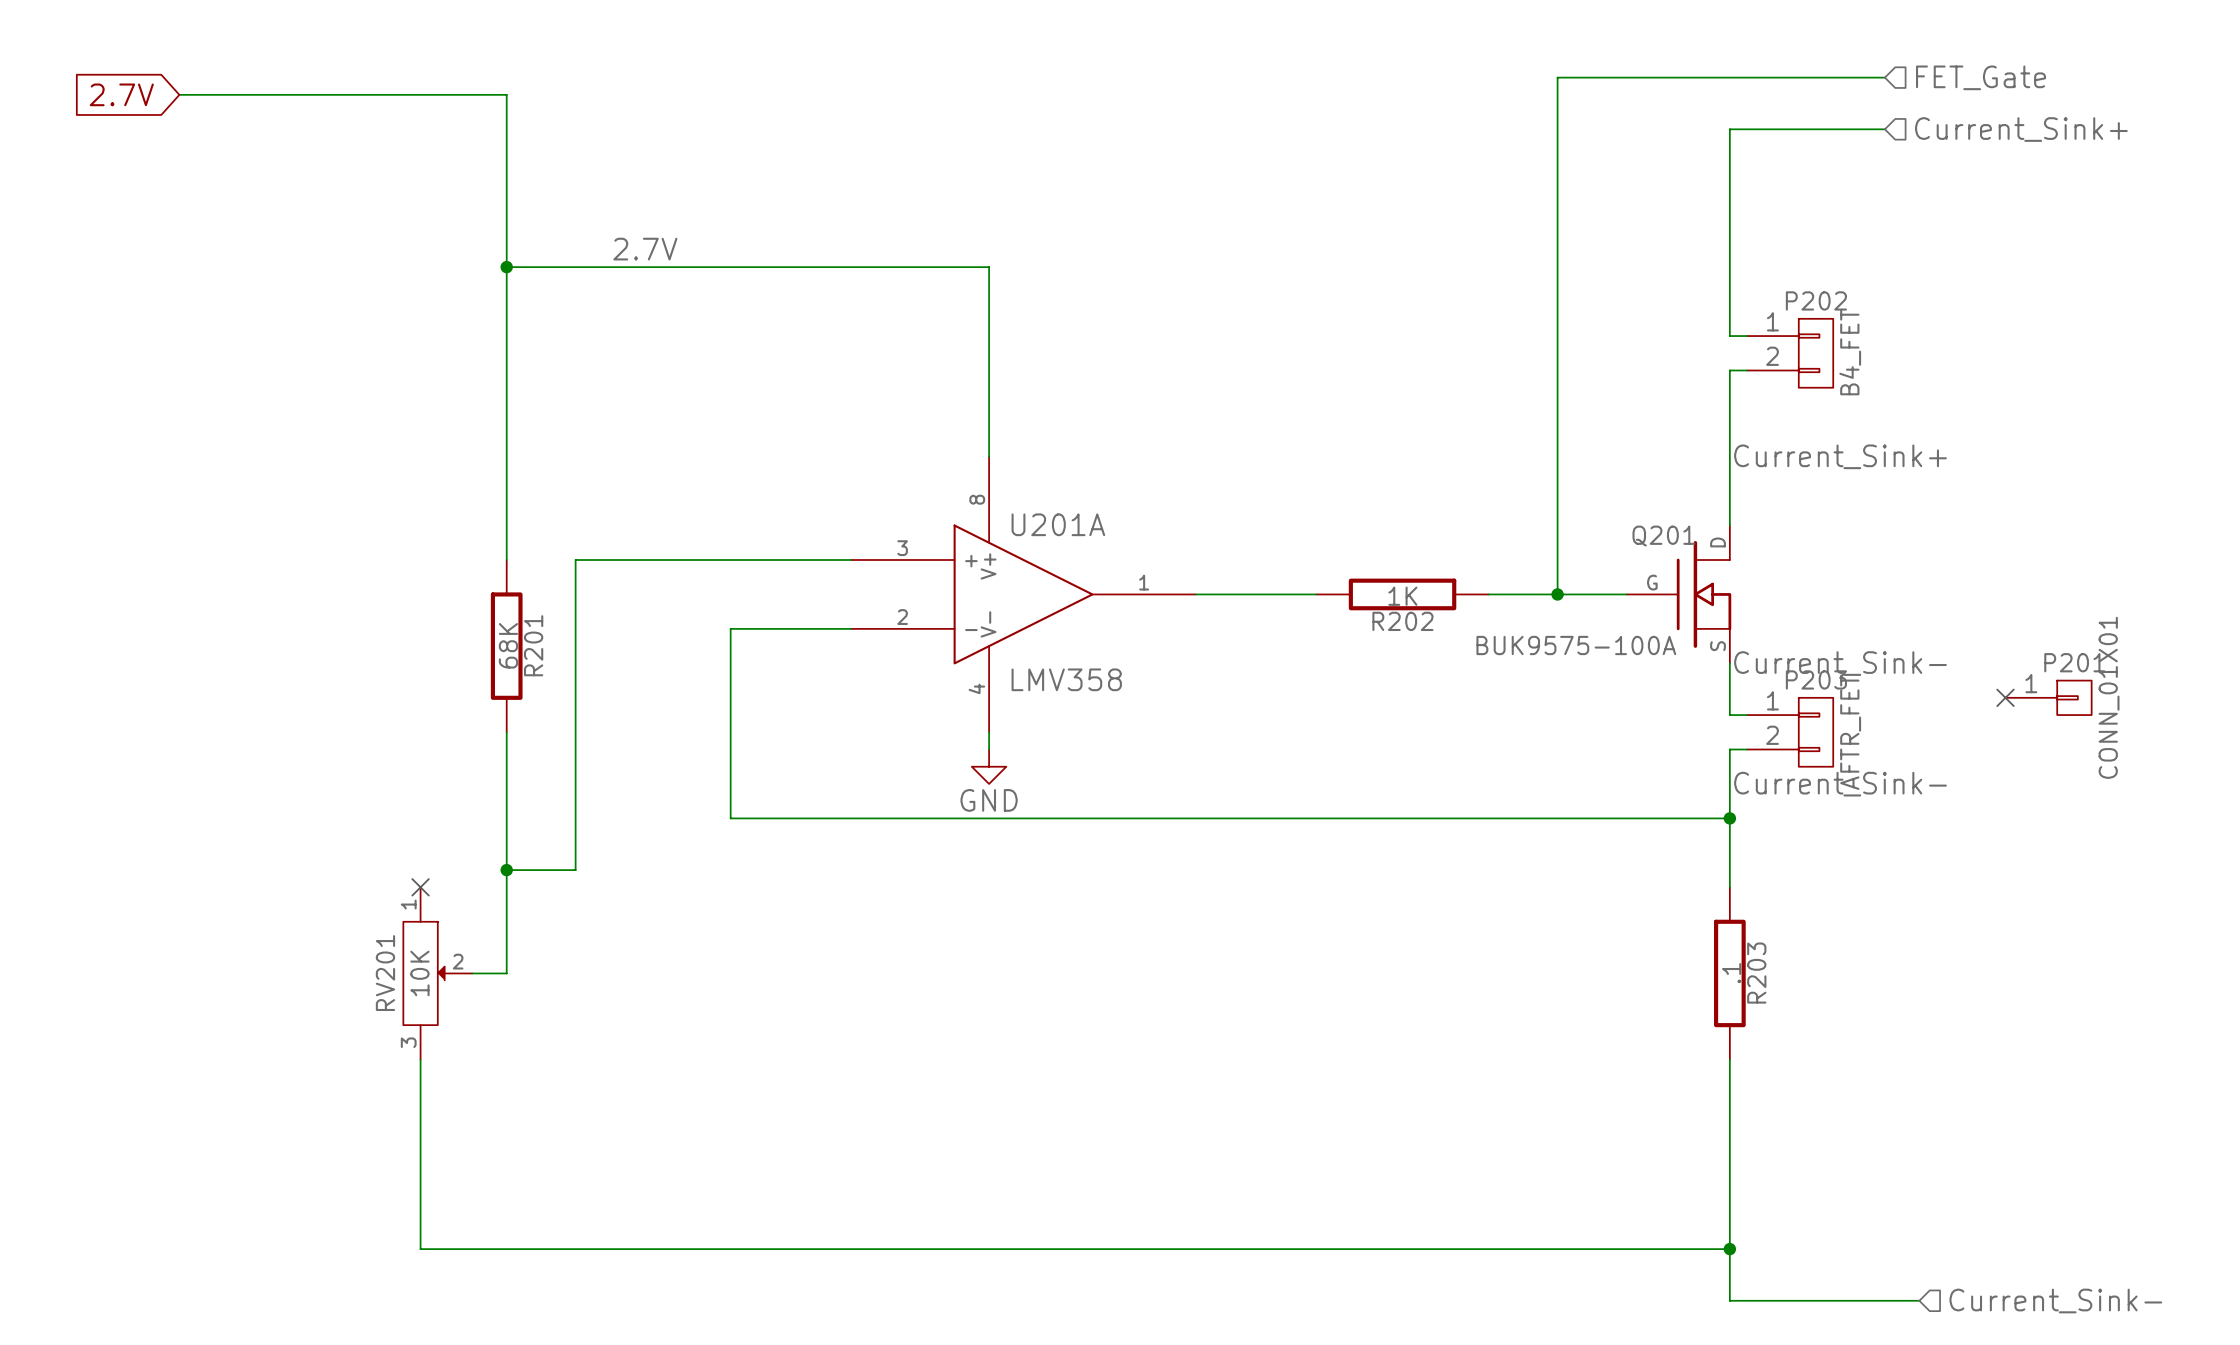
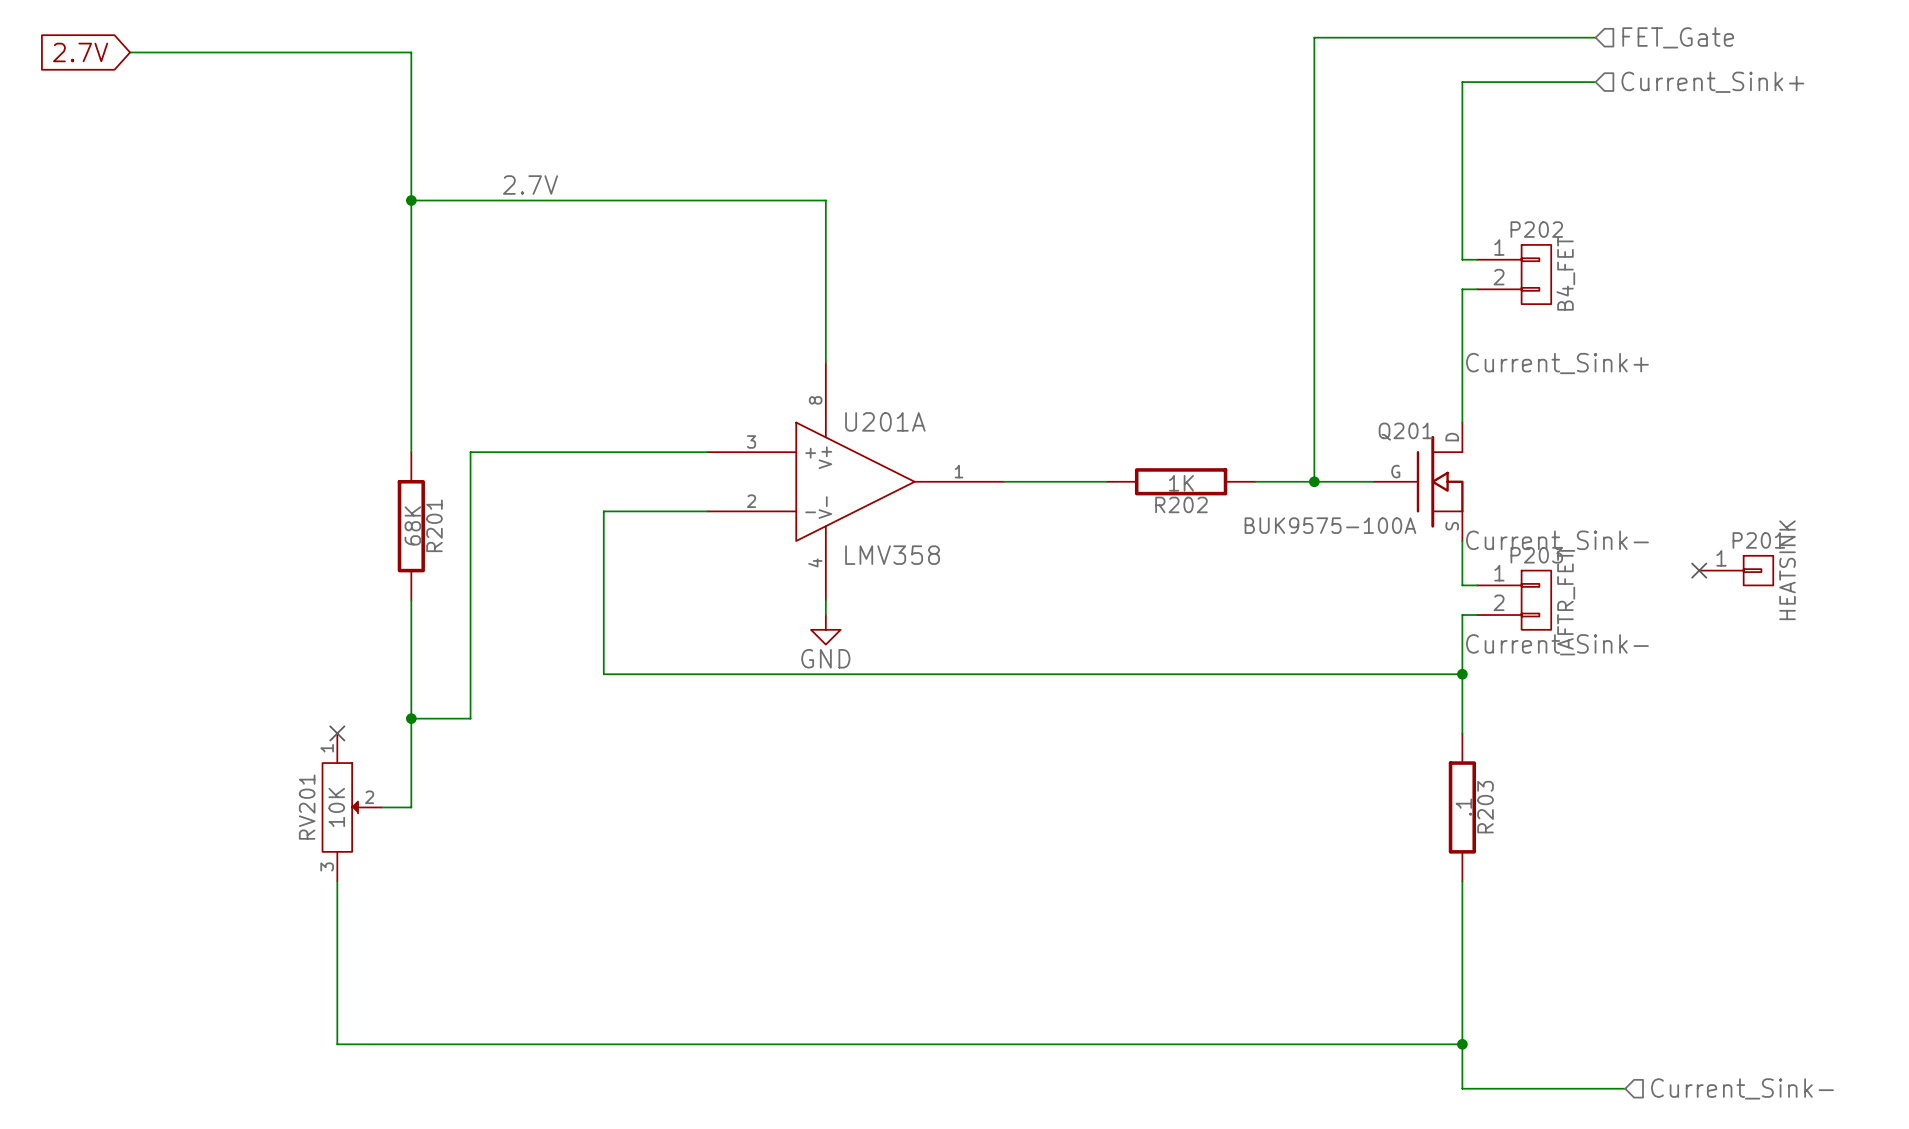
P201 value: CONN_01X01 (2109, 697) -> HEATSINK (1787, 570)

